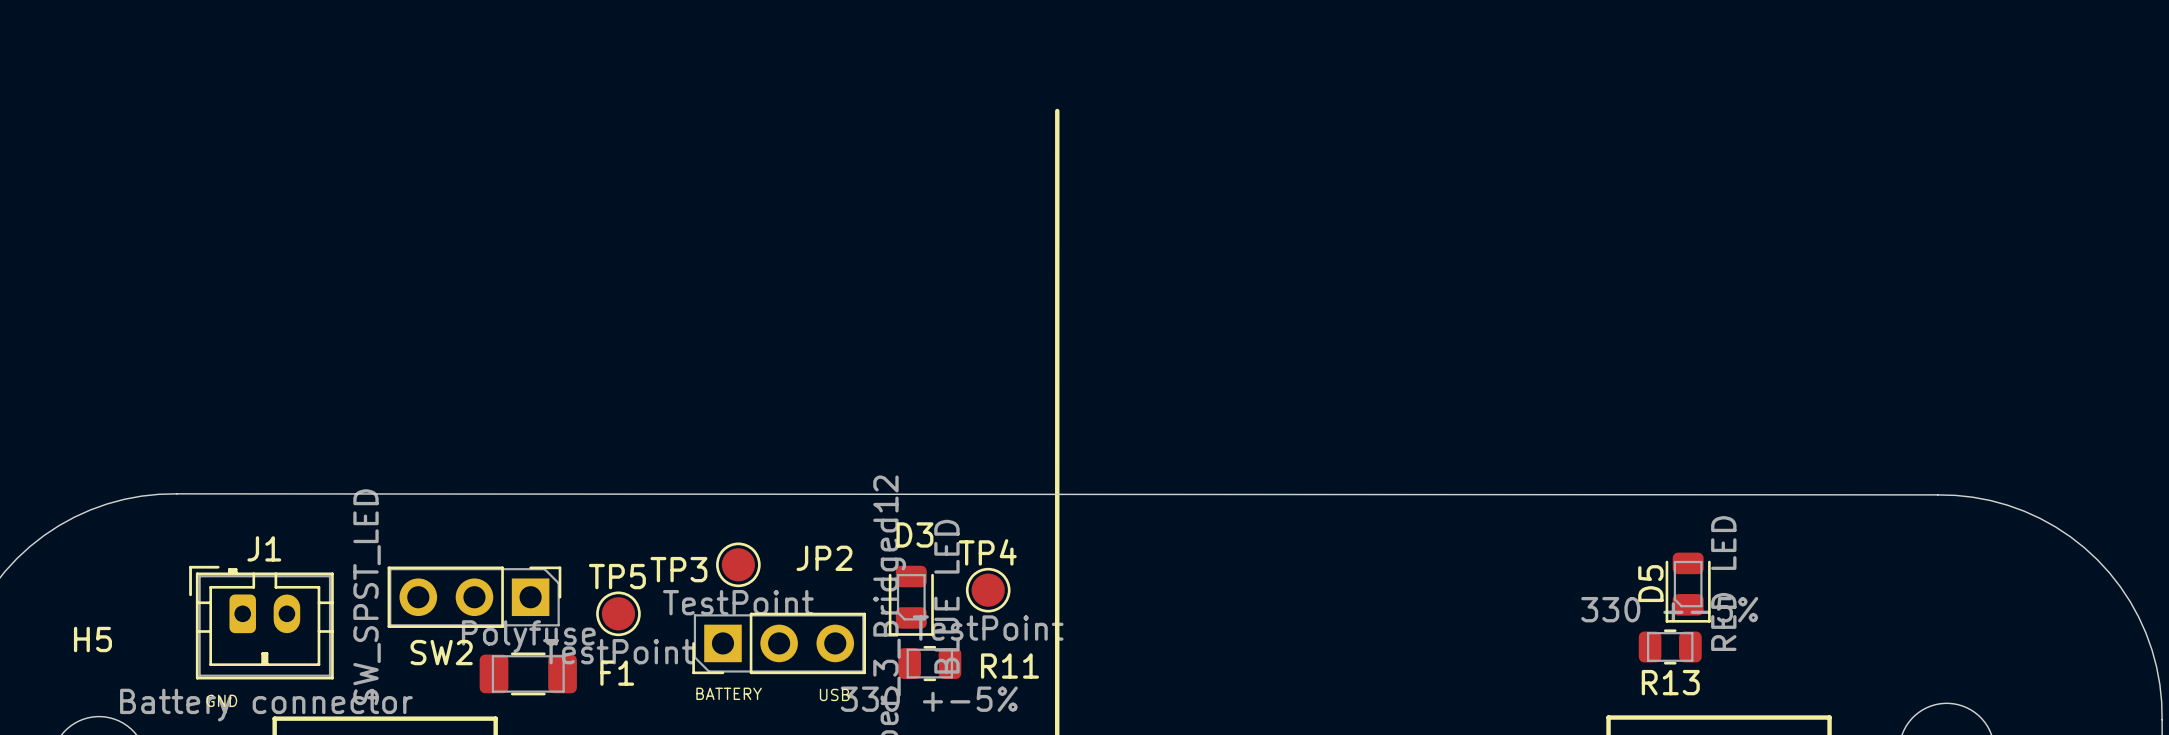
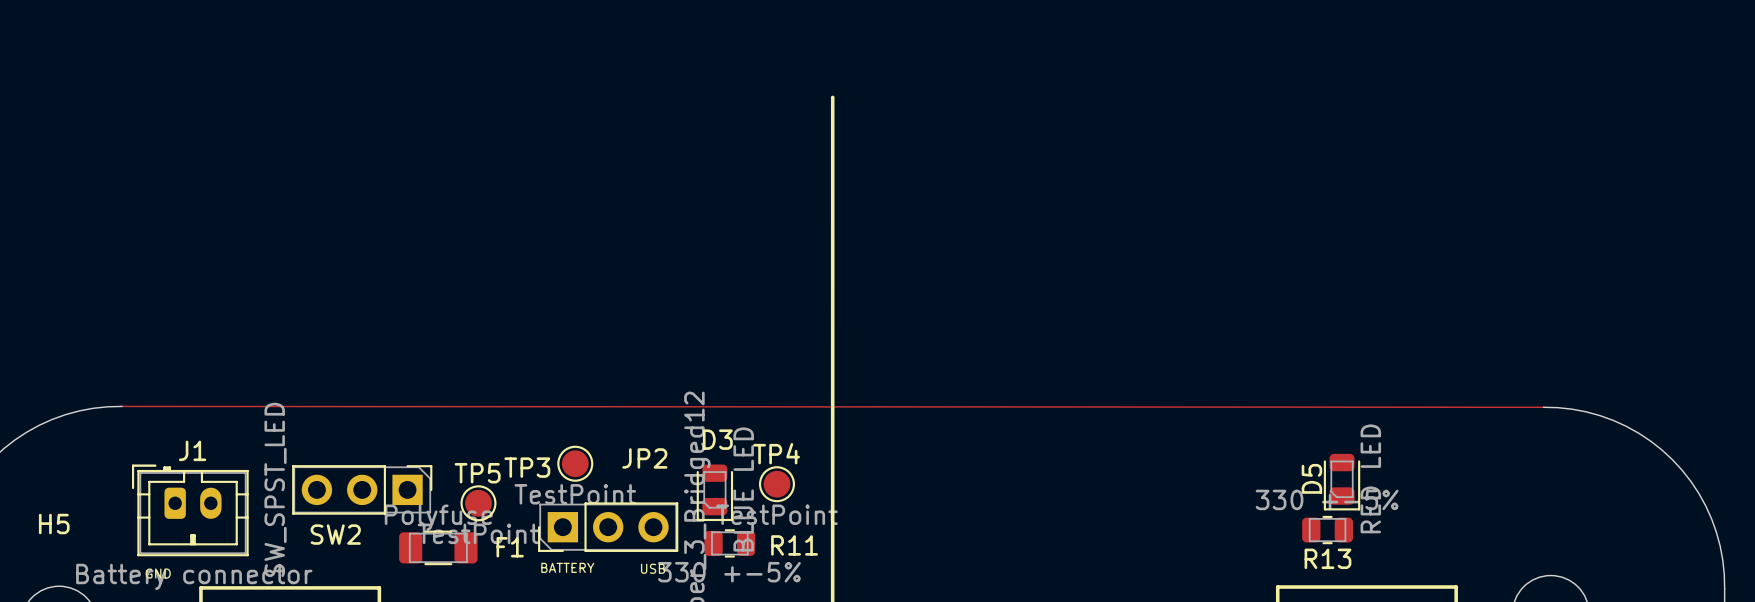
board edge: (176, 493) (1937, 494) -> none
track: none -> (122, 406) (1543, 407)
F1 position: (528, 673) -> (438, 547)

